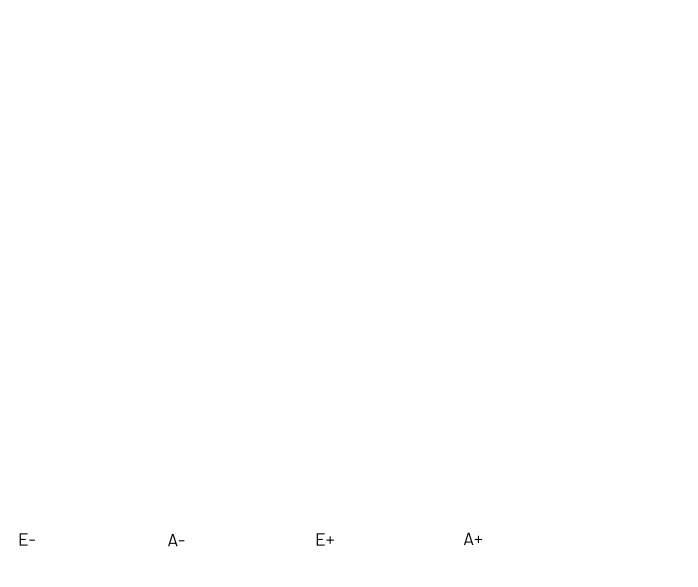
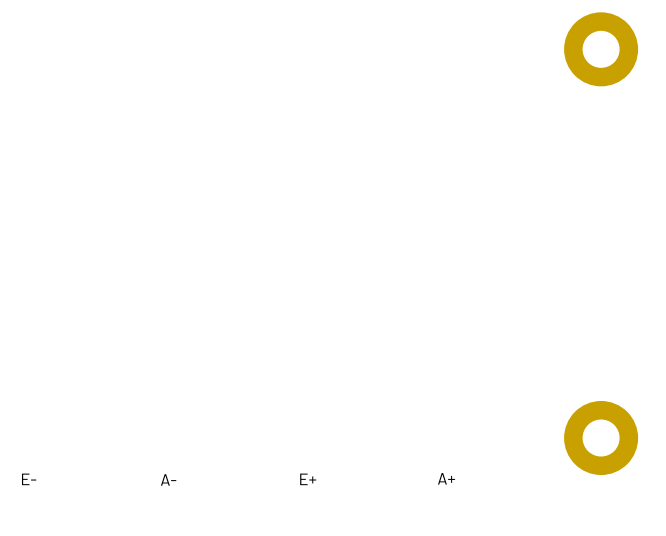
part: none -> (601, 49)
part: none -> (601, 438)

